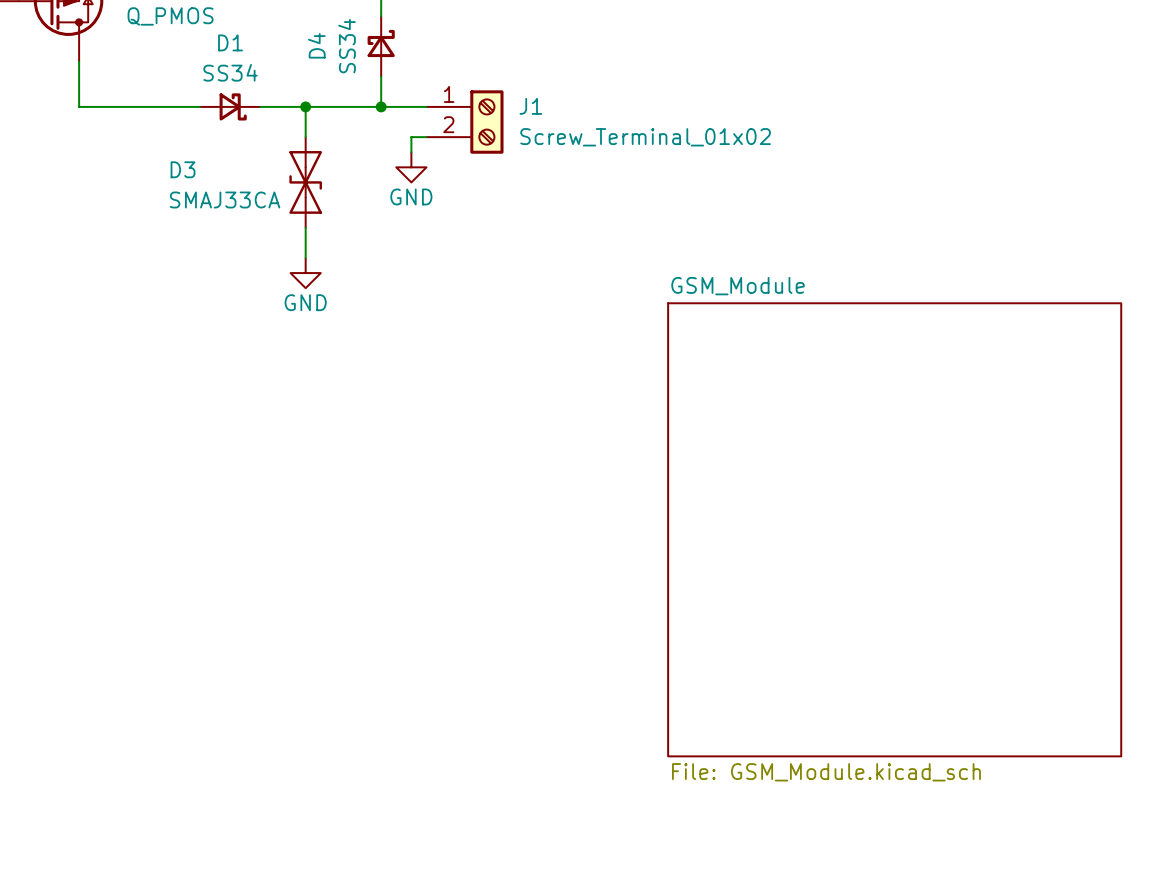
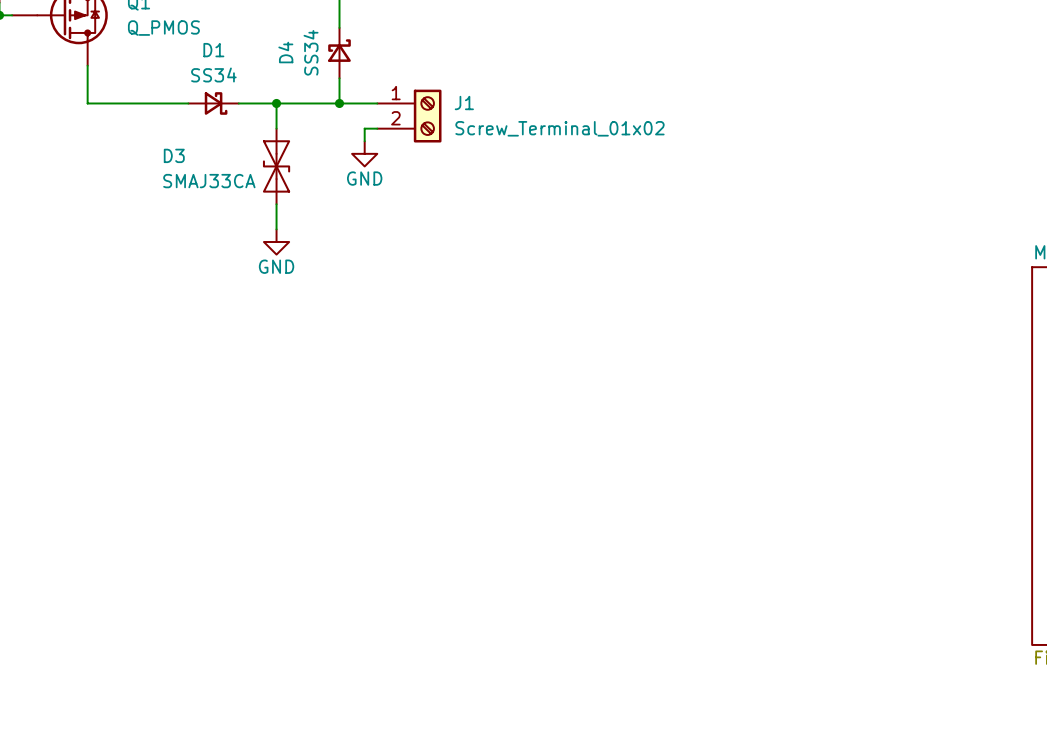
sheet GSM_Module: File: GSM_Module.kicad_sch (894, 529) -> none

